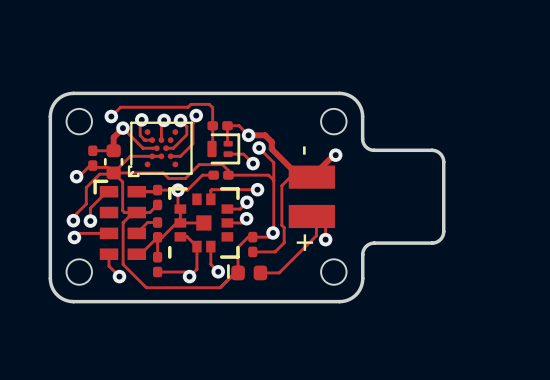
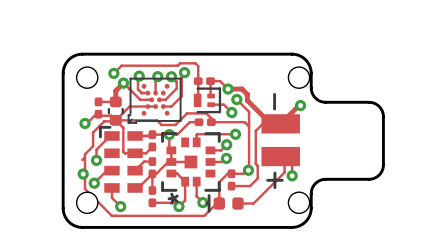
board edge: (325, 93) (344, 93) (357, 102) (362, 113) (363, 141) (368, 148) (433, 150) (440, 153) (443, 162) (443, 231) (441, 238) (433, 243) (368, 244) (363, 251) (362, 281) (357, 292) (344, 301) (325, 301) -> (291, 54) (302, 57) (309, 65) (311, 91) (316, 99) (325, 102) (372, 102) (380, 107) (383, 116) (383, 164) (380, 173) (370, 179) (325, 179) (318, 181) (311, 189) (311, 210) (308, 218) (300, 225) (291, 227)
part footprint: [168, 187, 240, 259] -> [161, 132, 221, 192]
track: (133, 212) (123, 222) (123, 264) (146, 287) -> (85, 157) (85, 188) (111, 215) (143, 215)
via position: (73, 220) -> (94, 183)
track: (102, 233) (76, 233) (74, 237) -> (106, 170) (94, 183)
line: none -> (209, 195) (209, 211)
part footprint: [227, 264, 268, 281] -> [205, 197, 244, 210]

